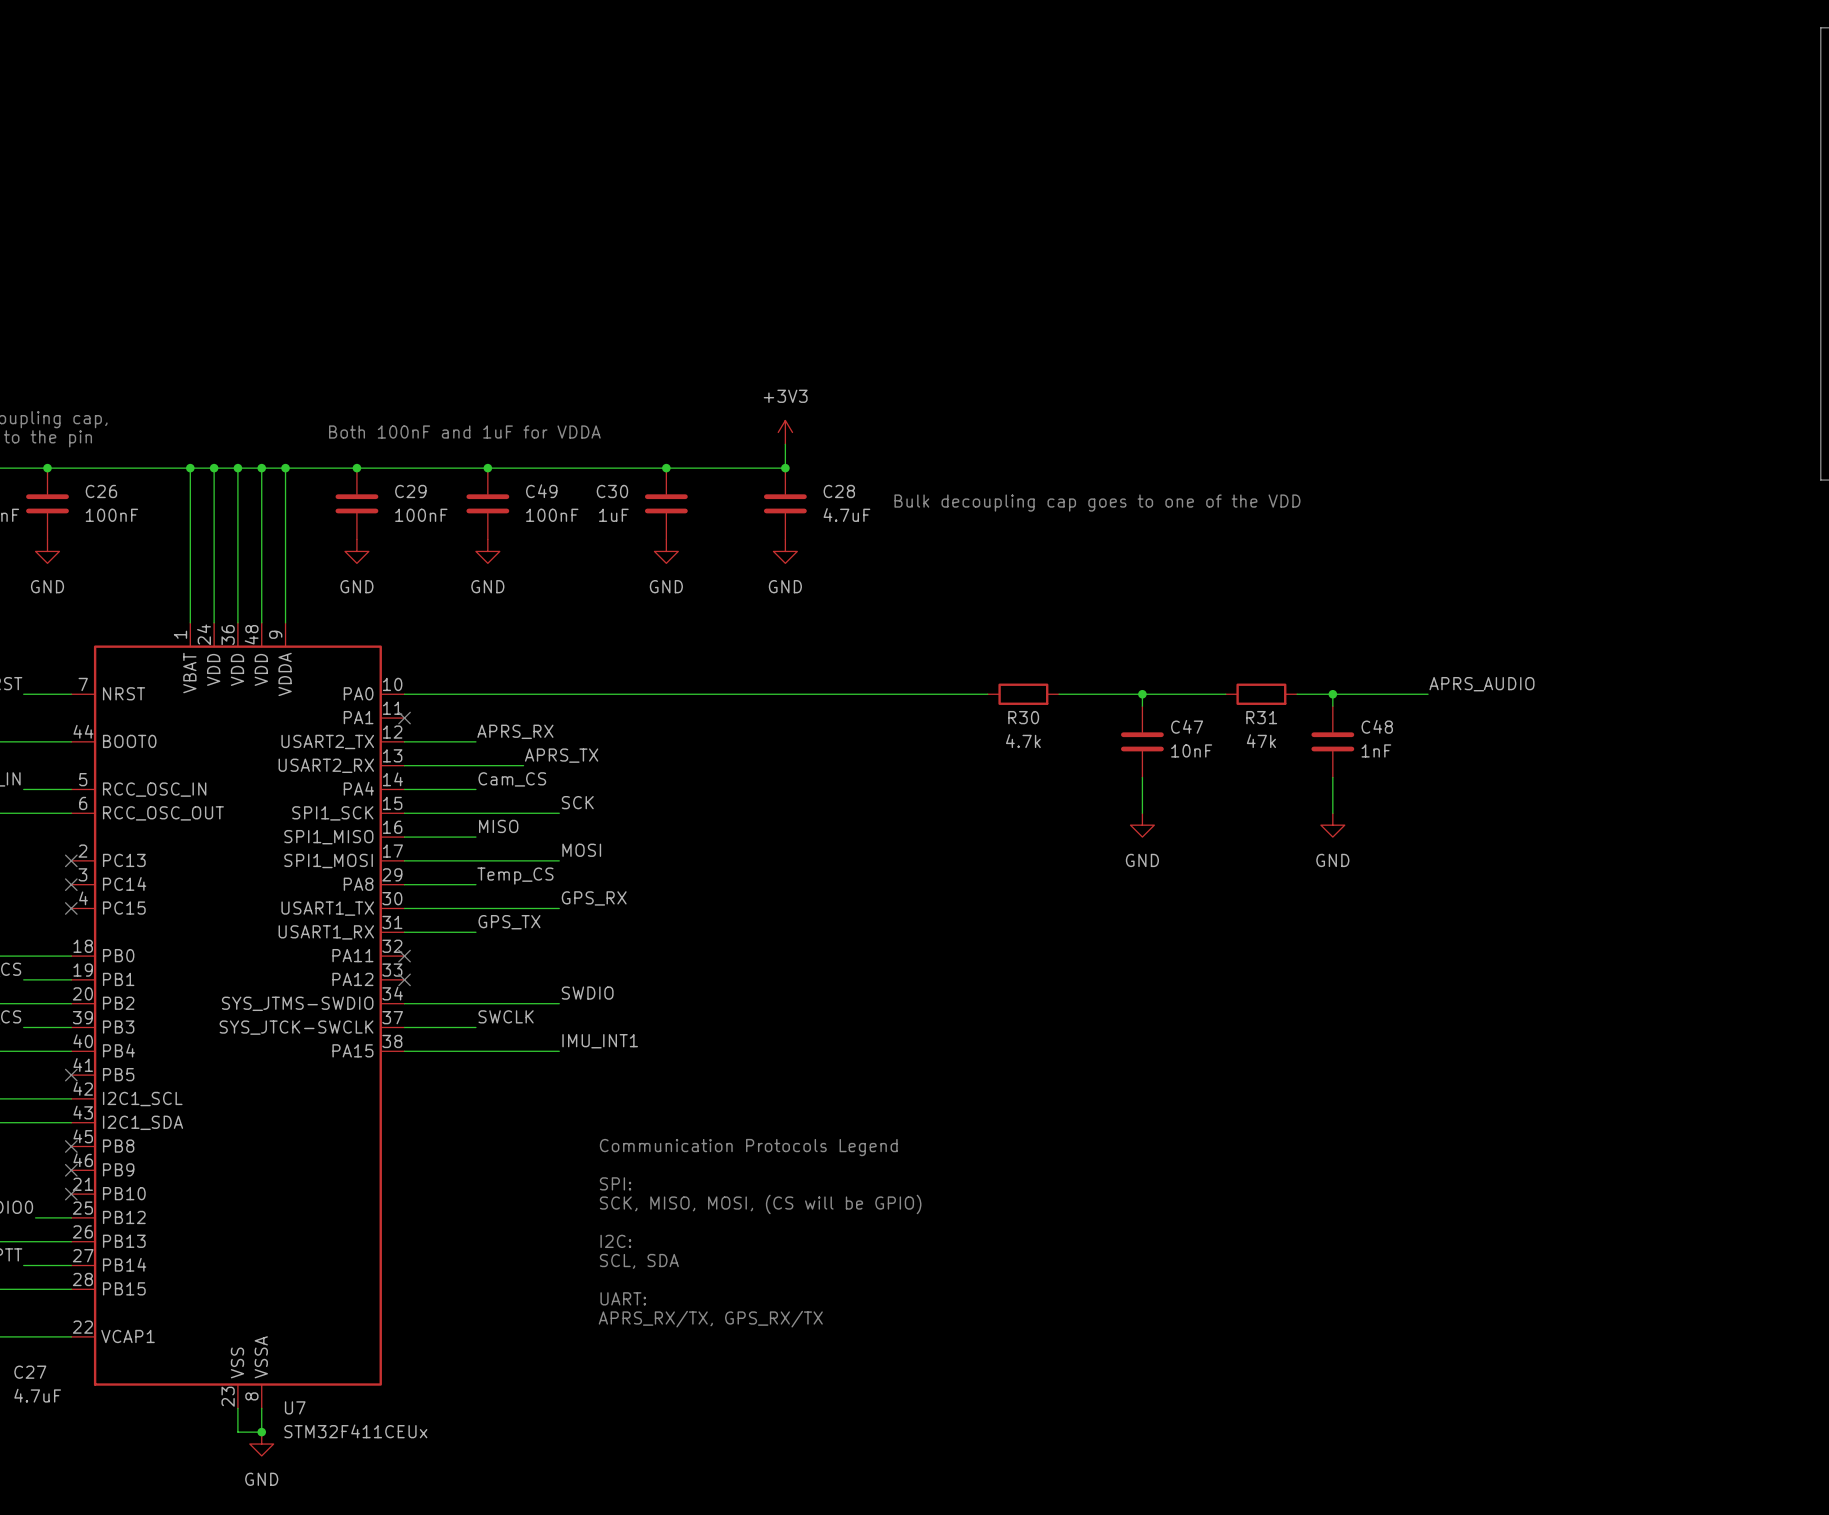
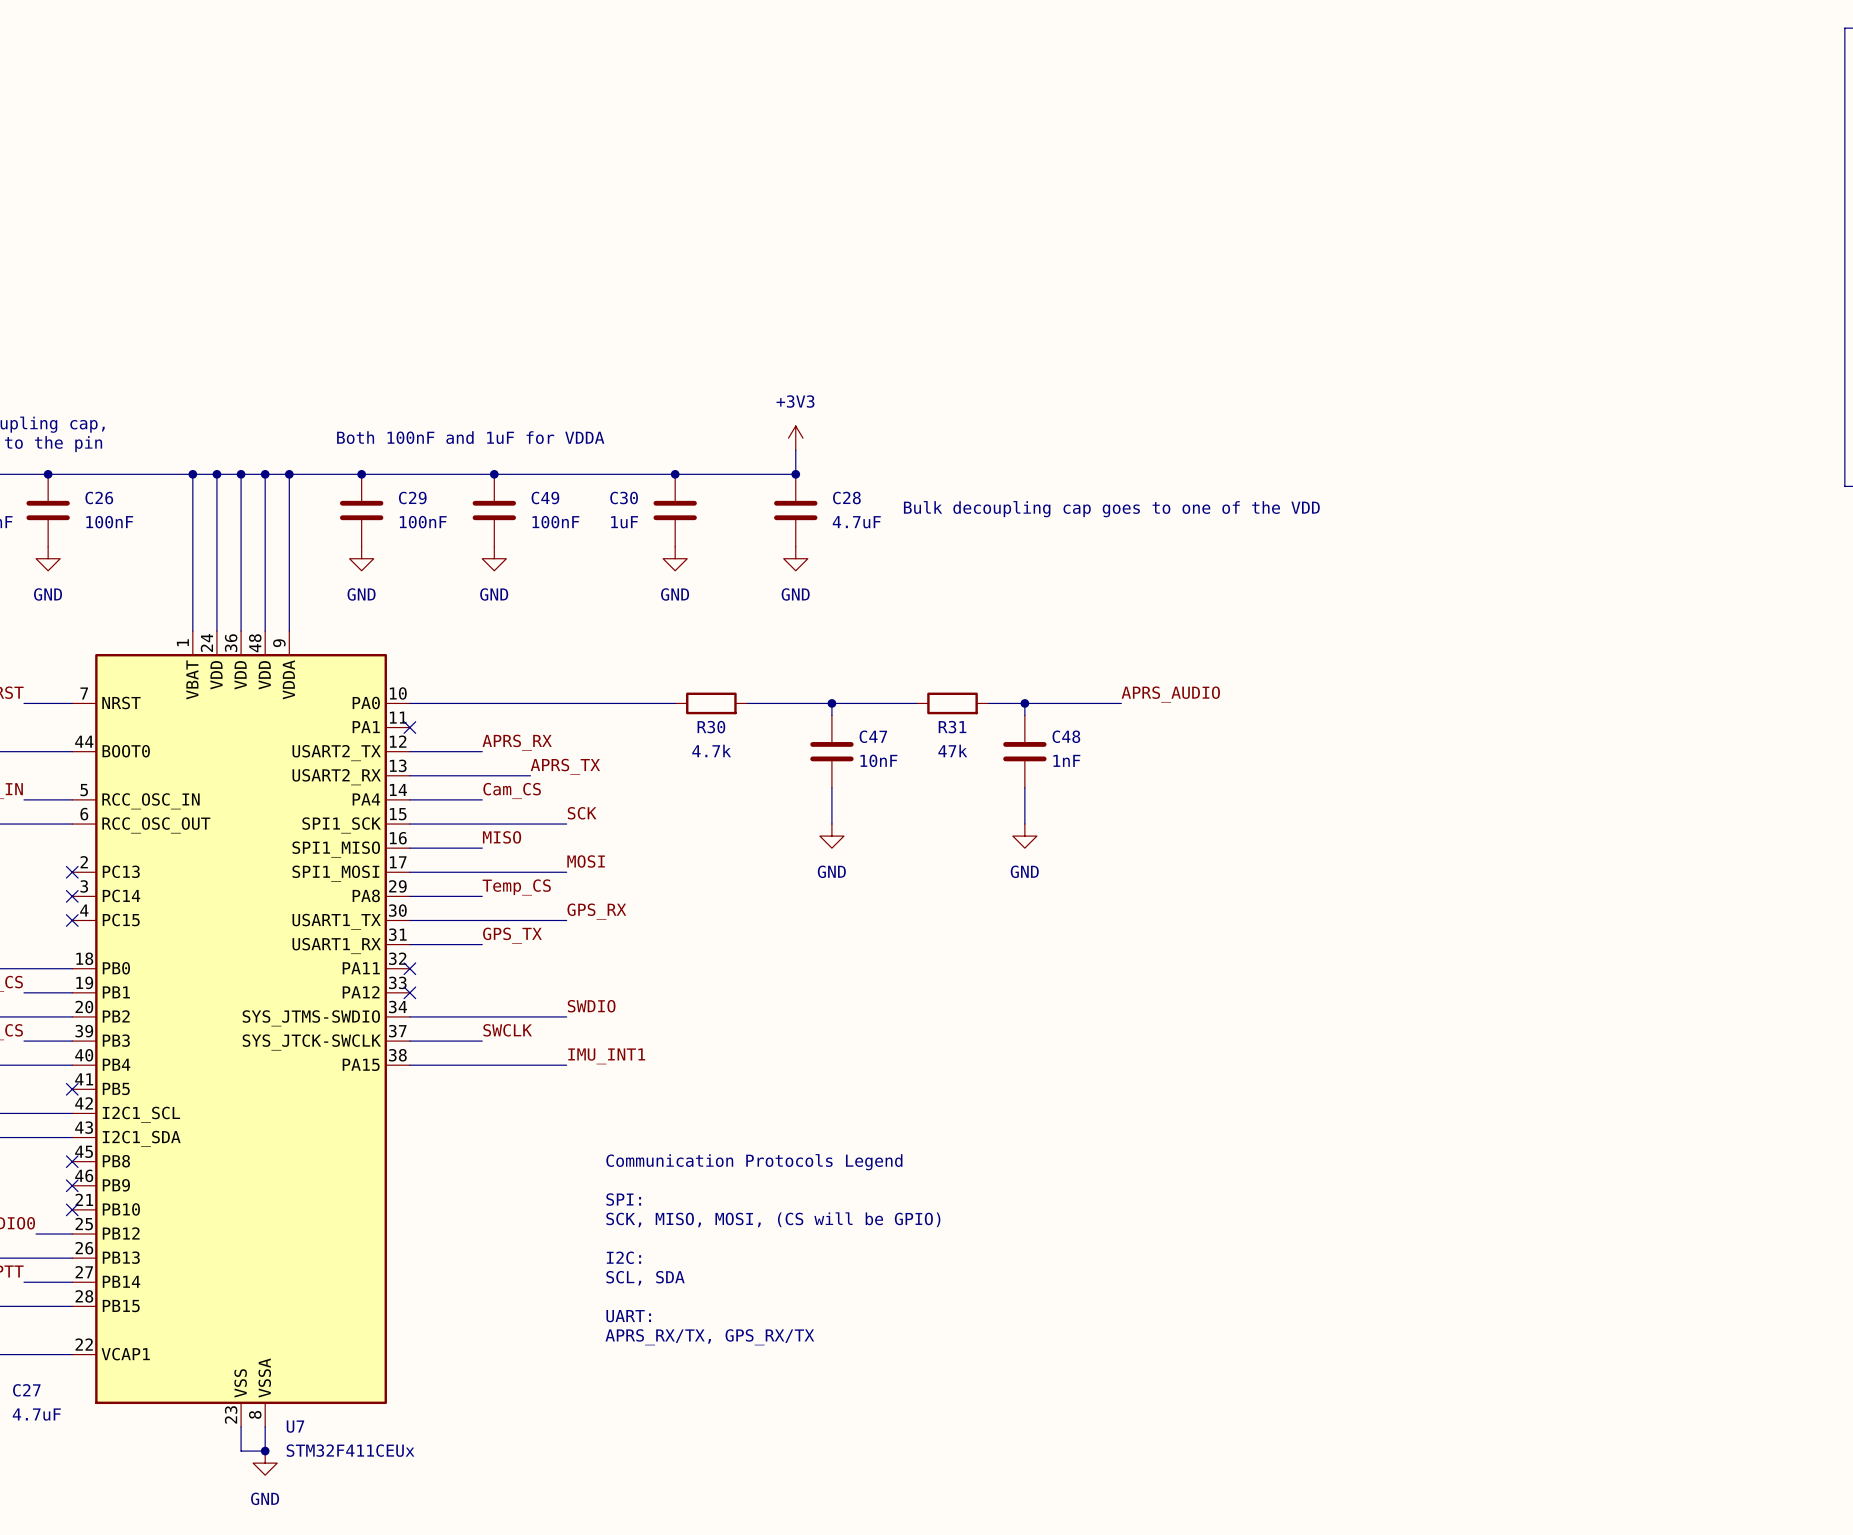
label: none -> APRS_AUDIO (1170, 694)
label: APRS_AUDIO (1481, 684) -> none
wire: (666, 694) (737, 694) -> none
wire: none -> (831, 703) (831, 715)
junction: none -> (831, 703)
wire: (904, 694) (975, 694) -> (1000, 703) (1073, 703)
junction: none -> (1024, 703)
R30 position: (1023, 694) -> (711, 703)
wire: (1106, 694) (1225, 694) -> none
wire: (1142, 694) (1142, 706) -> (1024, 703) (1024, 715)
junction: (1142, 694) -> none
R31 position: (1261, 694) -> (952, 703)
wire: (1297, 694) (1428, 694) -> none
wire: (1332, 694) (1332, 706) -> none
junction: (1332, 694) -> none
C47 position: (1142, 741) -> (831, 751)
C48 position: (1332, 741) -> (1024, 751)
wire: none -> (831, 787) (831, 824)
wire: (1142, 777) (1142, 813) -> (1024, 787) (1024, 824)
wire: (1332, 777) (1332, 813) -> none
power symbol: none -> GND (831, 836)
power symbol position: GND (1142, 825) -> GND (1024, 836)
power symbol: GND (1332, 825) -> none

